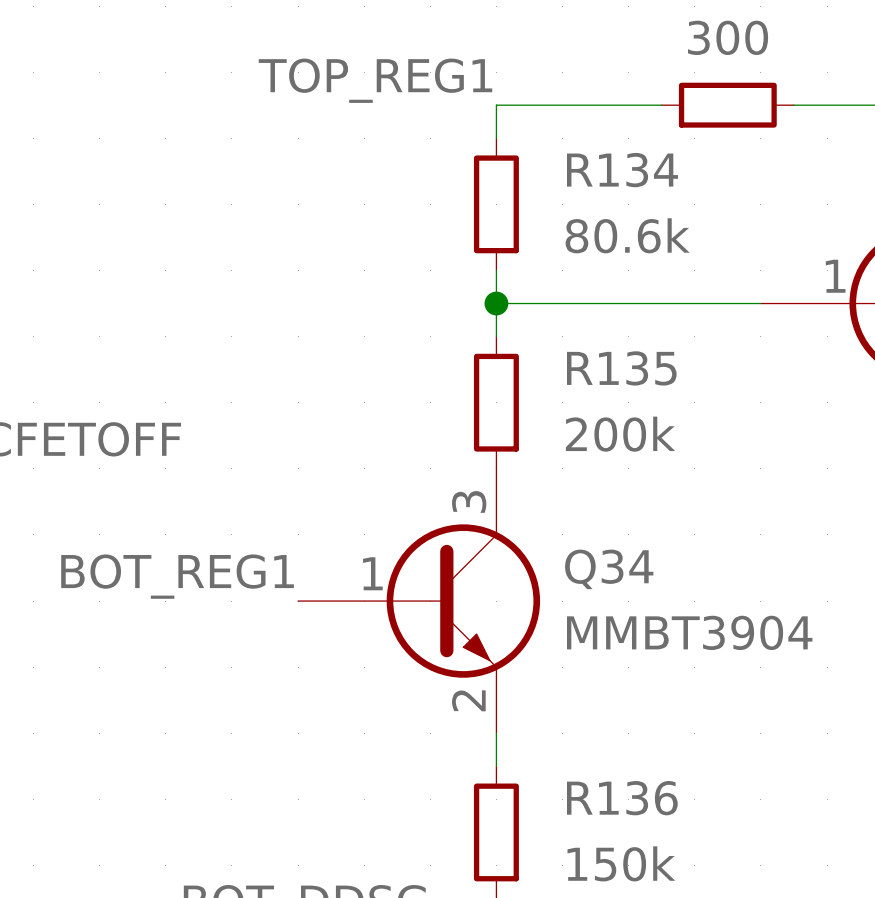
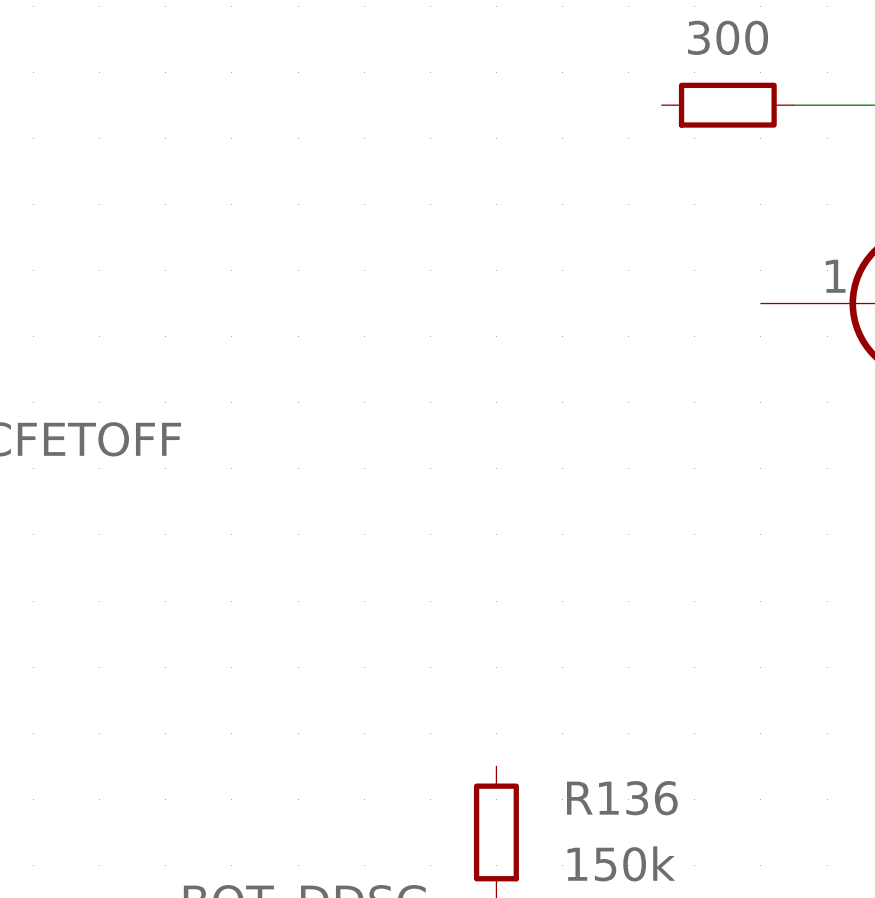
label: TOP_REG1 (375, 80) -> none
wire: (661, 105) (496, 105) (496, 138) -> none
R134: 80.6k (496, 204) -> none
wire: (496, 270) (496, 336) -> none
wire: (496, 303) (760, 303) -> none
junction: (496, 303) -> none
R135: 200k (496, 402) -> none
label: BOT_REG1 (177, 576) -> none
Q34: MMBT3904 (419, 601) -> none
wire: (496, 733) (496, 766) -> none

